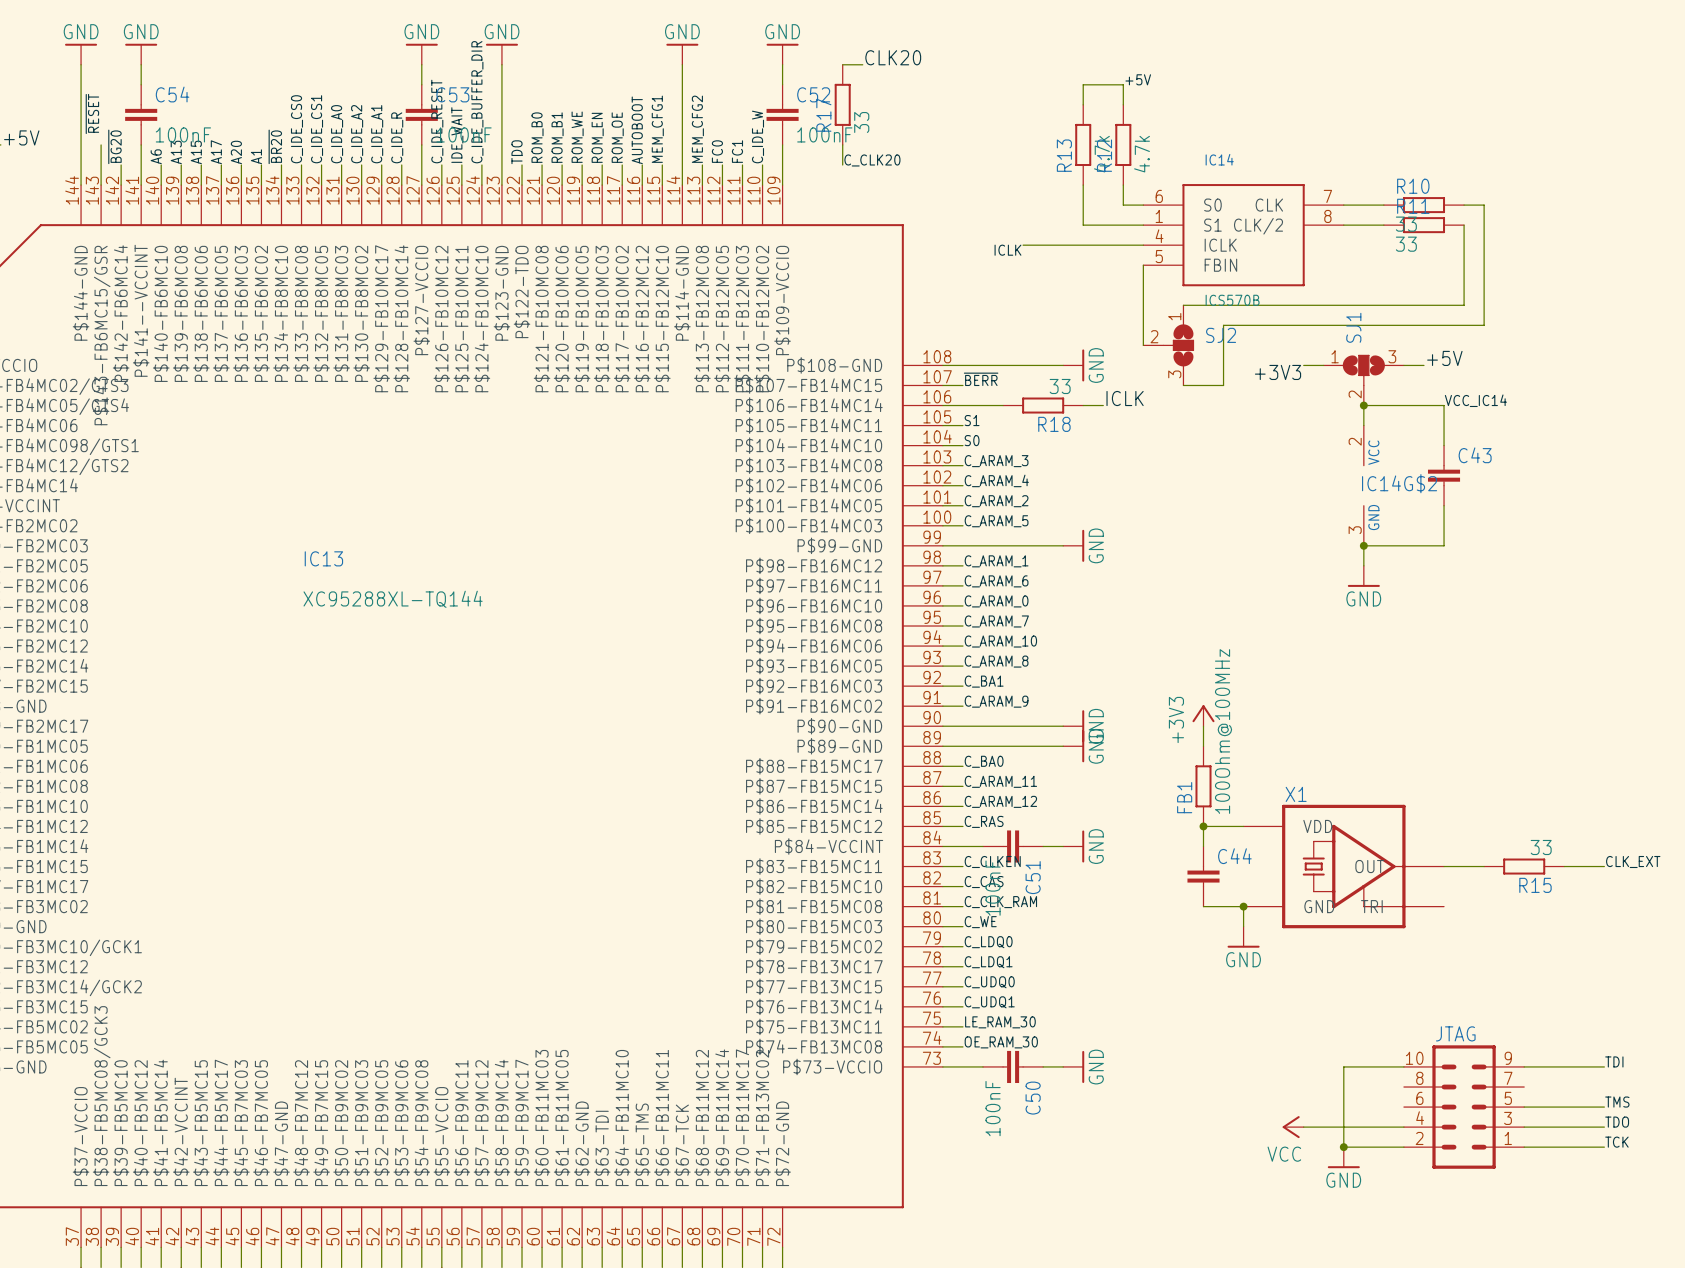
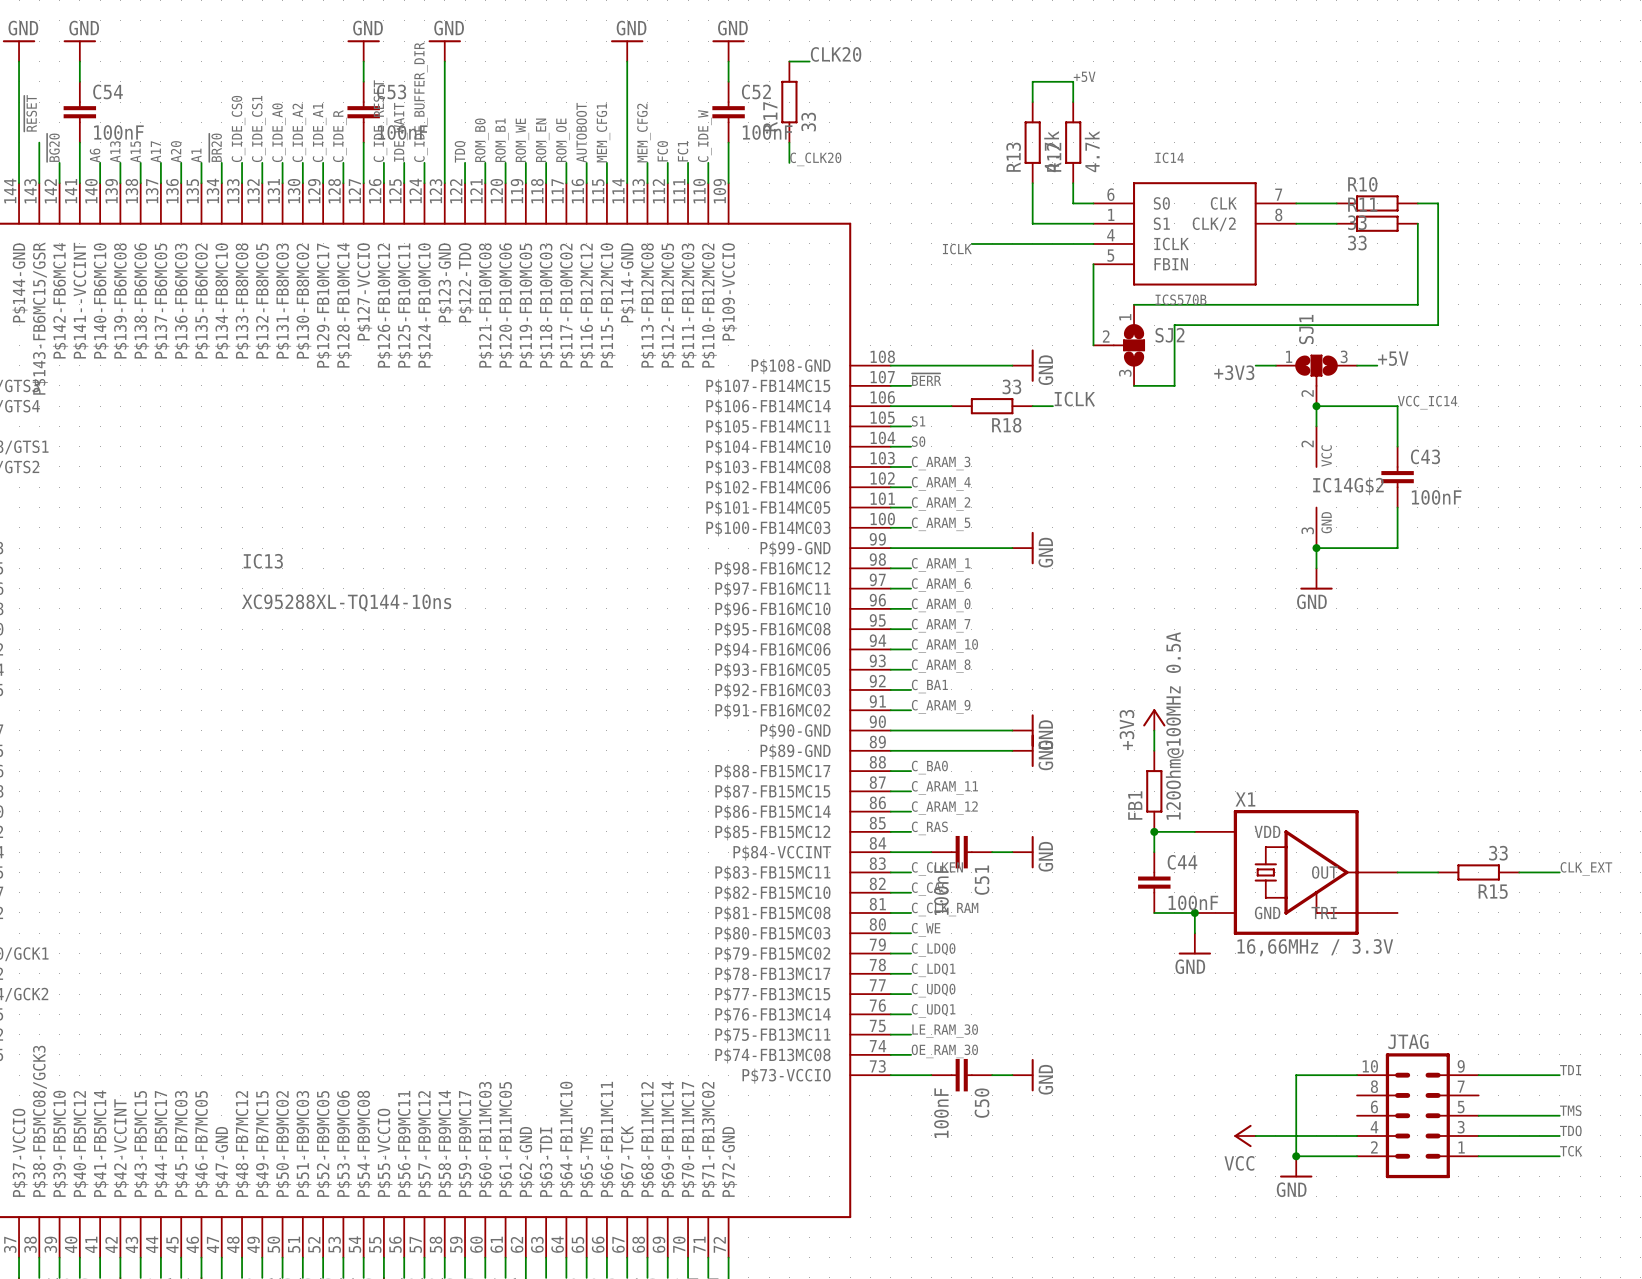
C43 value: none -> 100nF (1436, 497)
IC13 value: XC95288XL-TQ144 (393, 599) -> XC95288XL-TQ144-10ns (346, 602)
FB1 value: 100Ohm@100MHz (1223, 731) -> 120Ohm@100MHz 0.5A (1174, 725)
C44 value: none -> 100nF (1193, 902)
X1 value: none -> 16,66MHz / 3.3V (1315, 947)

